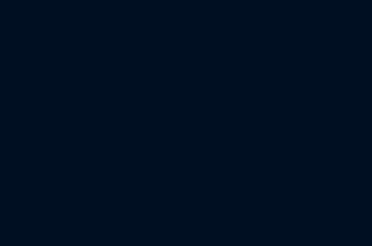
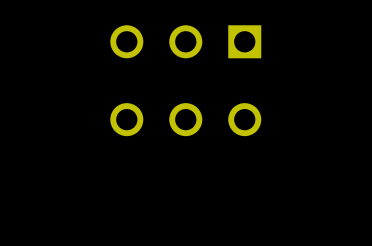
part: none -> (185, 80)

